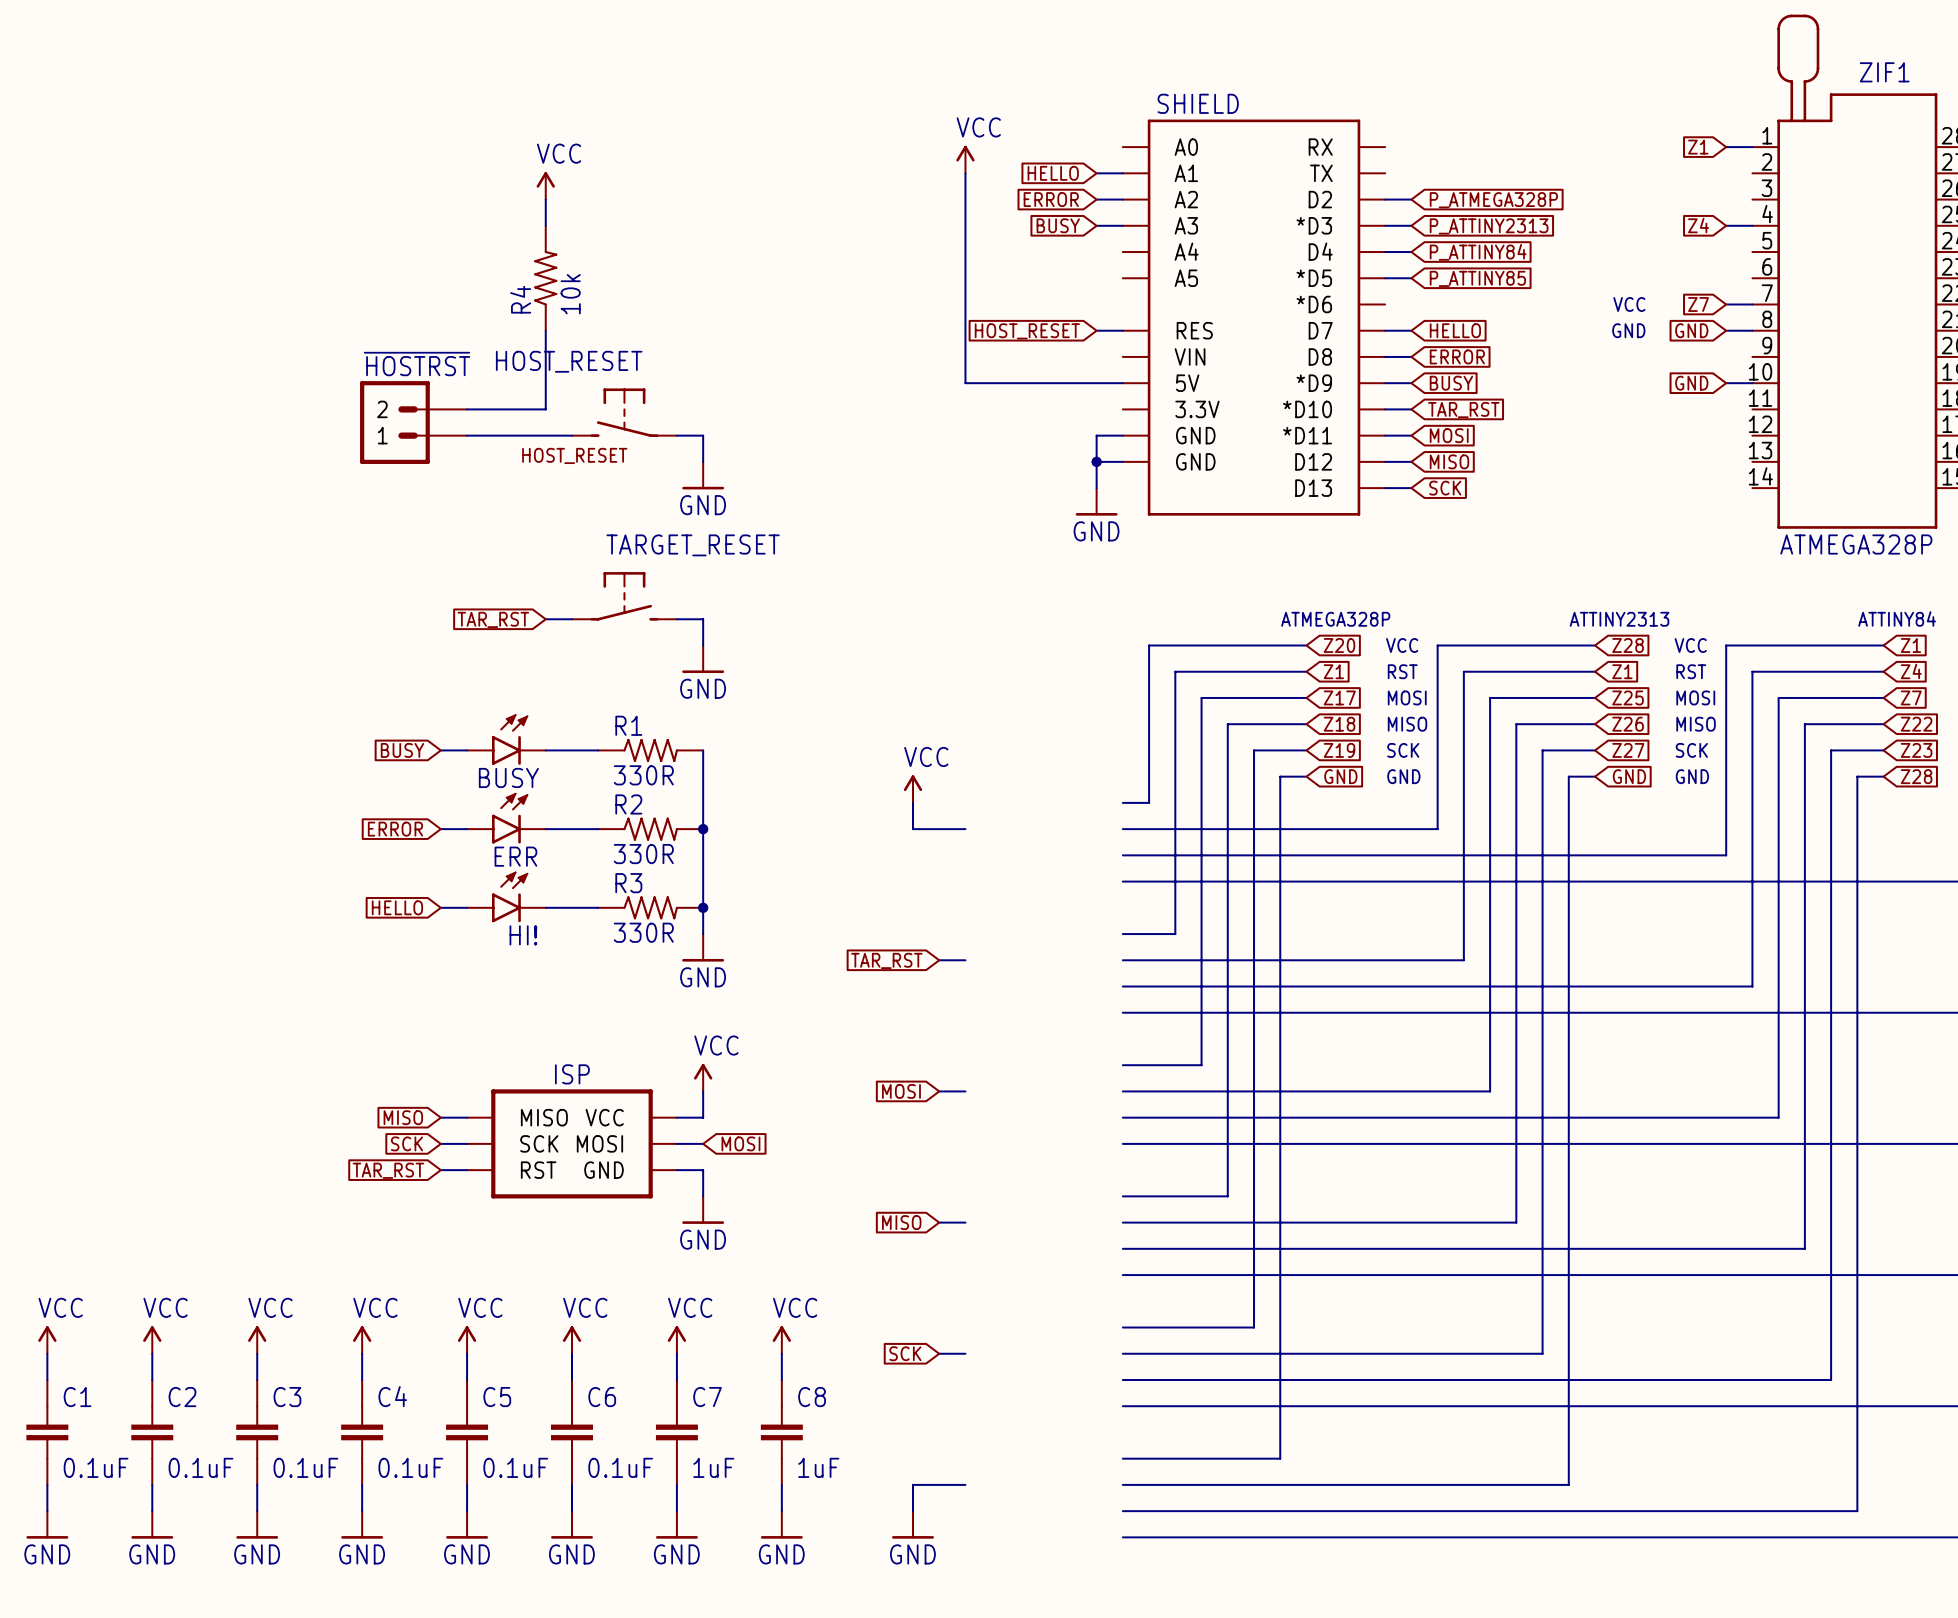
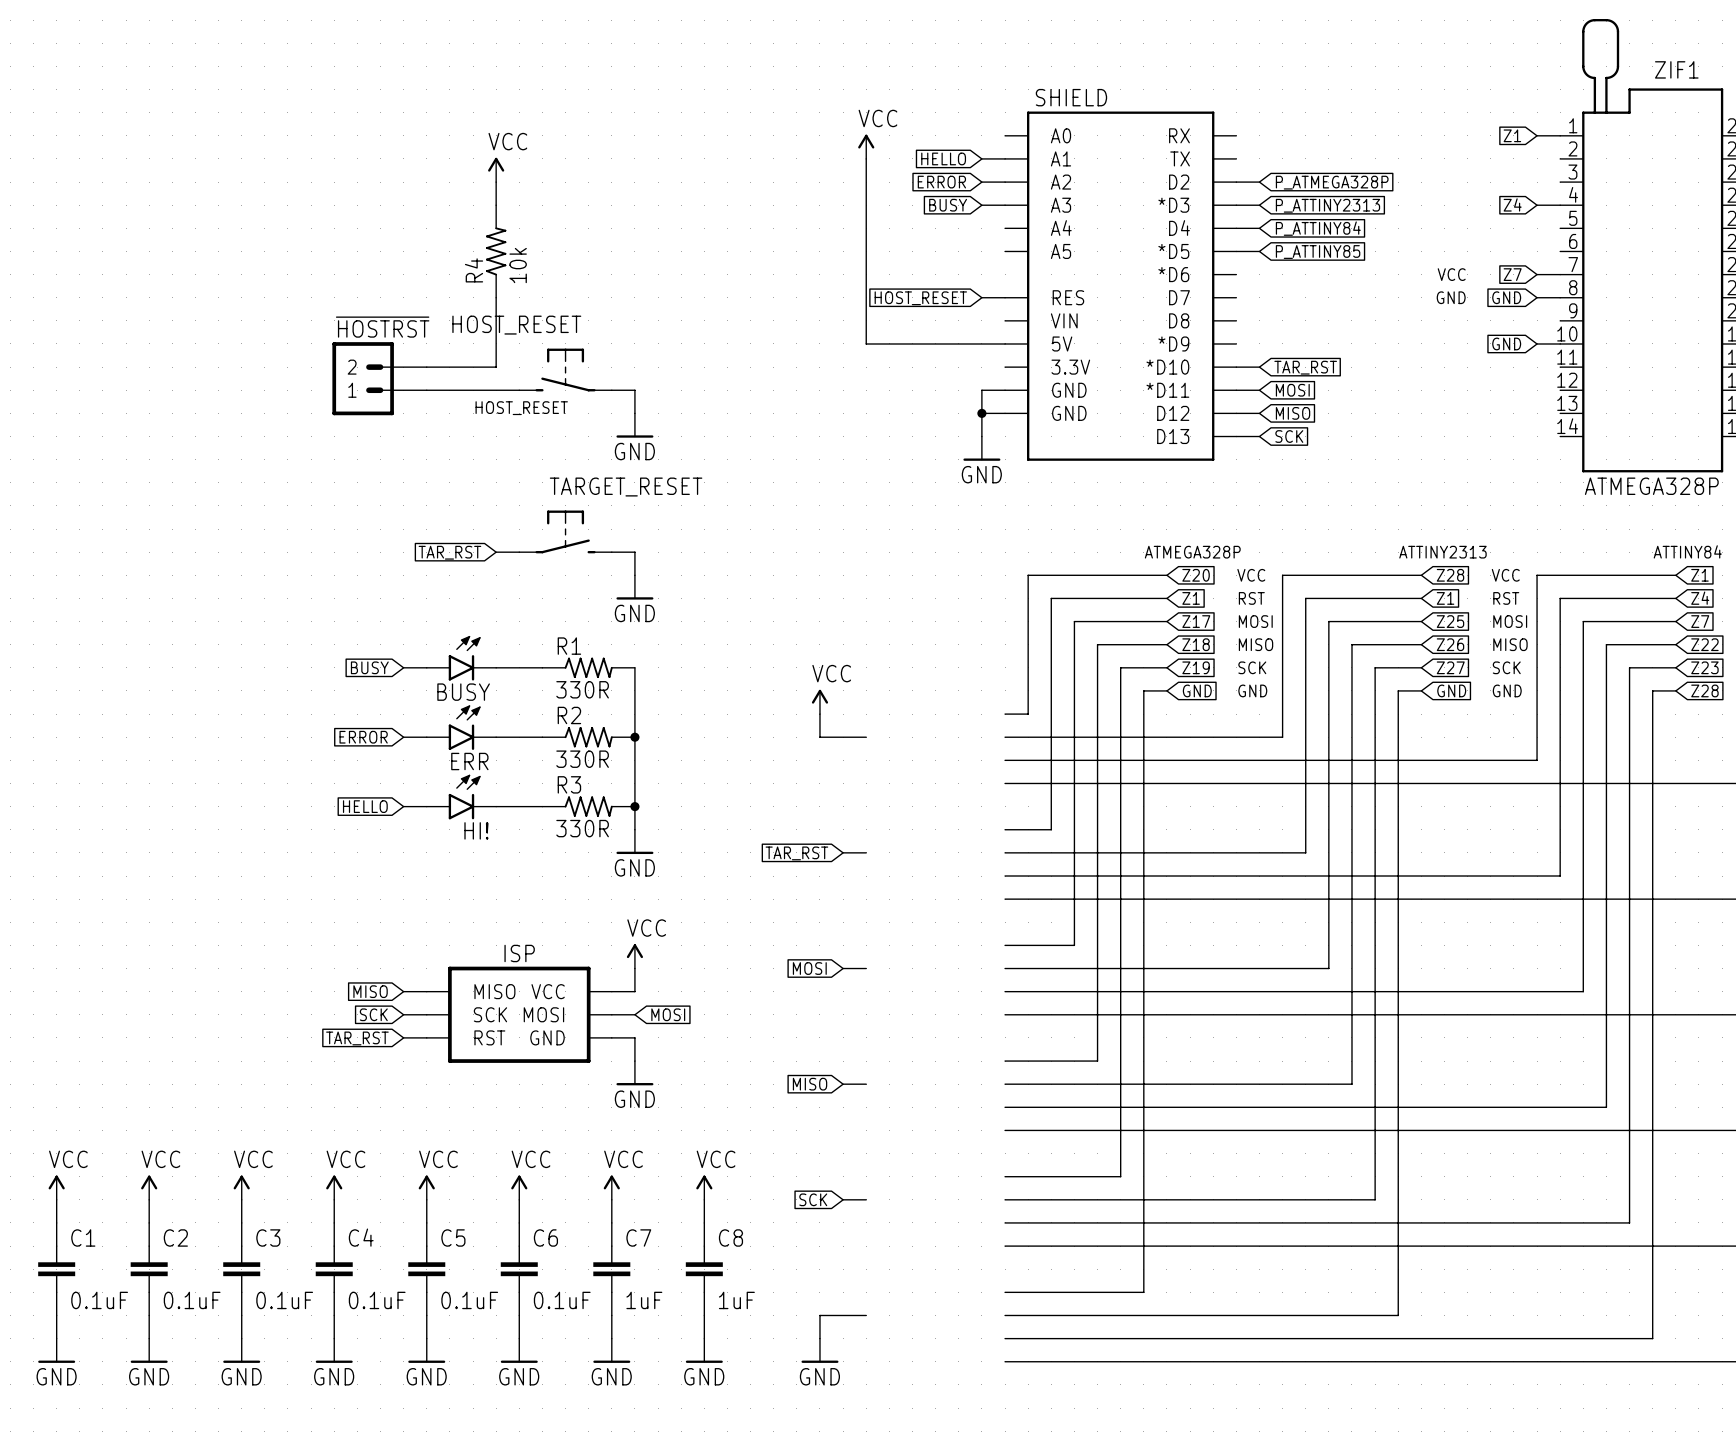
wire: (1385, 330) (1411, 330) -> none
global label: HELLO (1455, 330) -> none
wire: (1385, 356) (1411, 356) -> none
global label: ERROR (1457, 356) -> none
wire: (1385, 383) (1411, 383) -> none
global label: BUSY (1451, 383) -> none

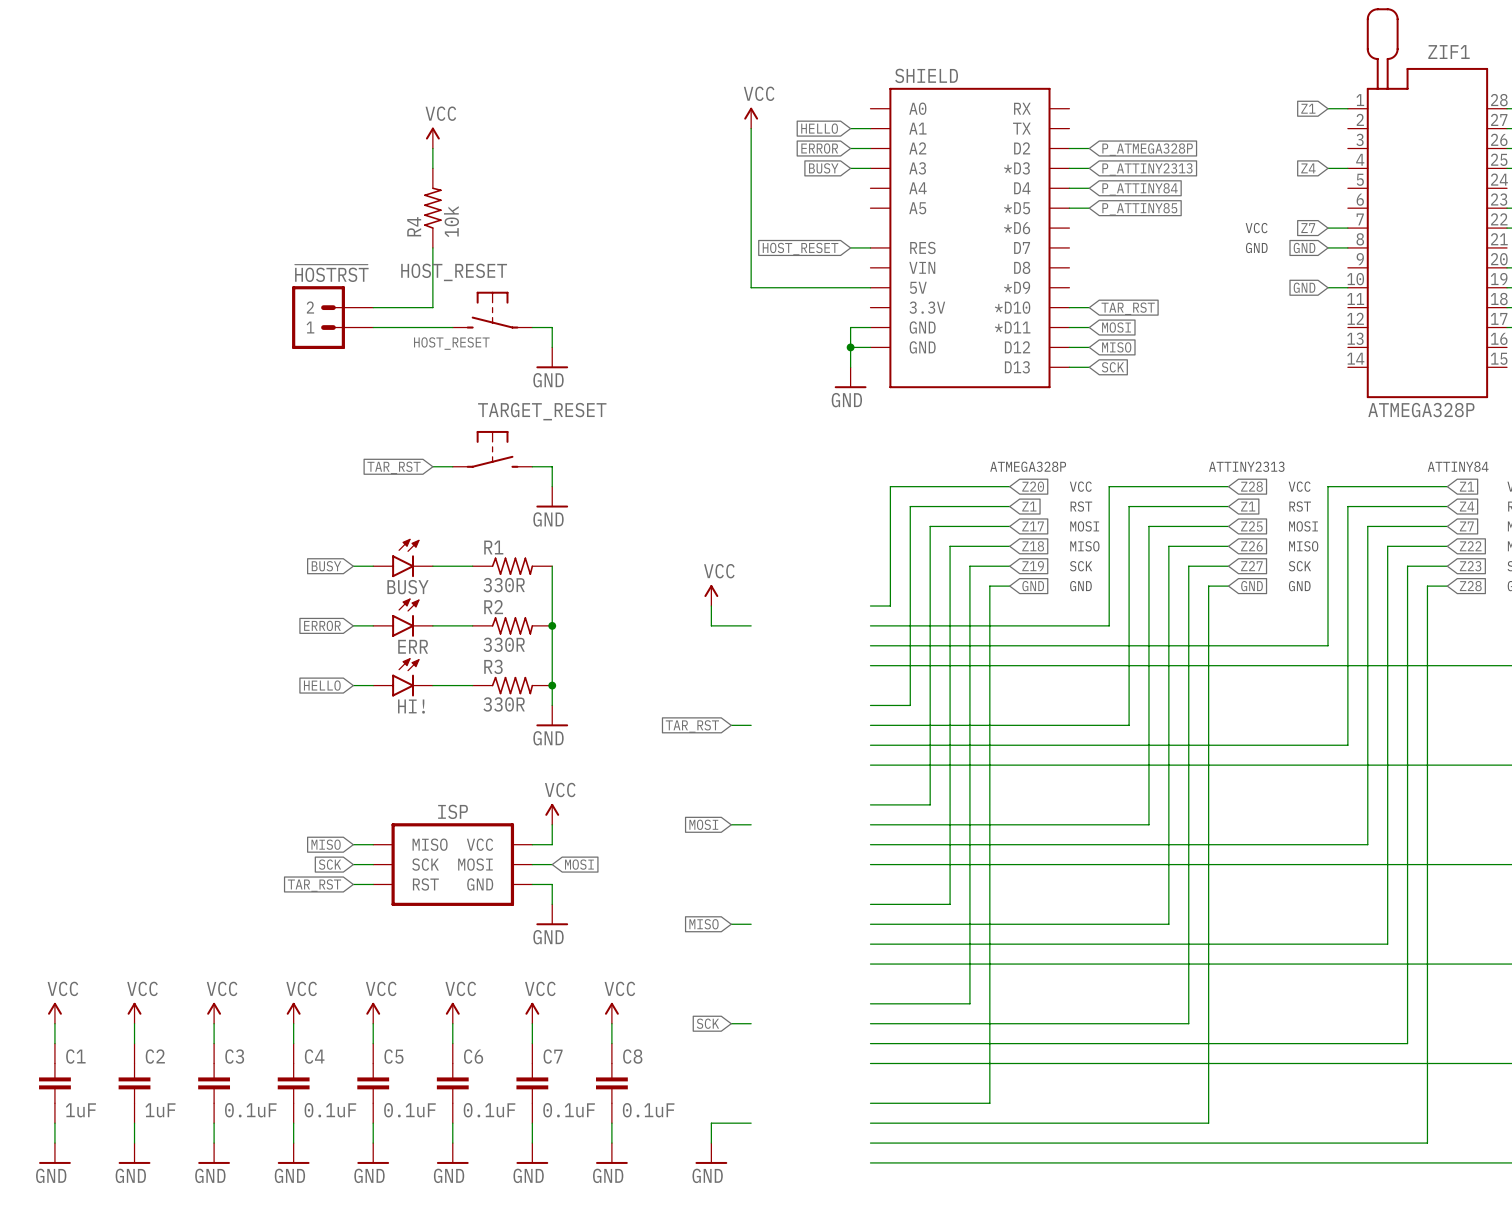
C1 value: 0.1uF (99, 1300) -> 1uF (80, 1110)
C2 value: 0.1uF (192, 1300) -> 1uF (160, 1110)
C7 value: 1uF (644, 1300) -> 0.1uF (569, 1110)
C8 value: 1uF (736, 1300) -> 0.1uF (648, 1110)

